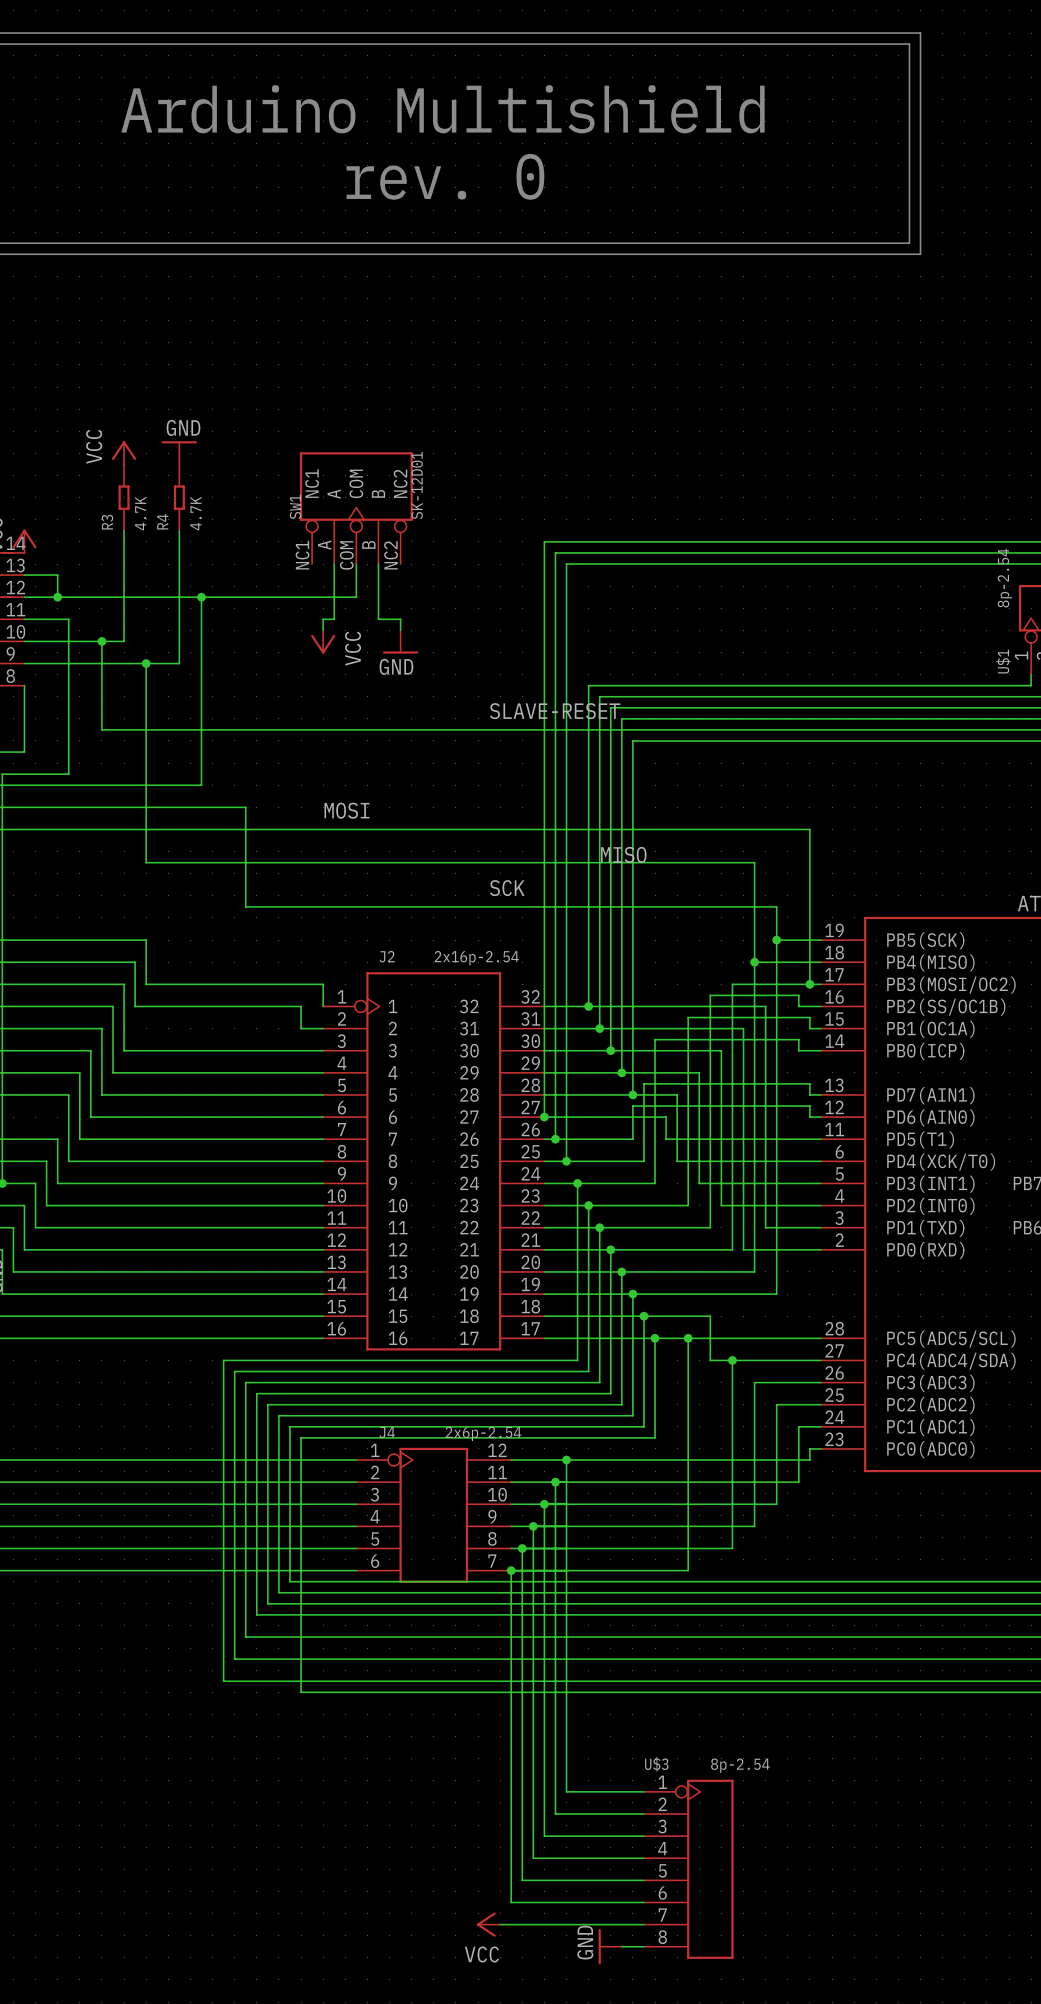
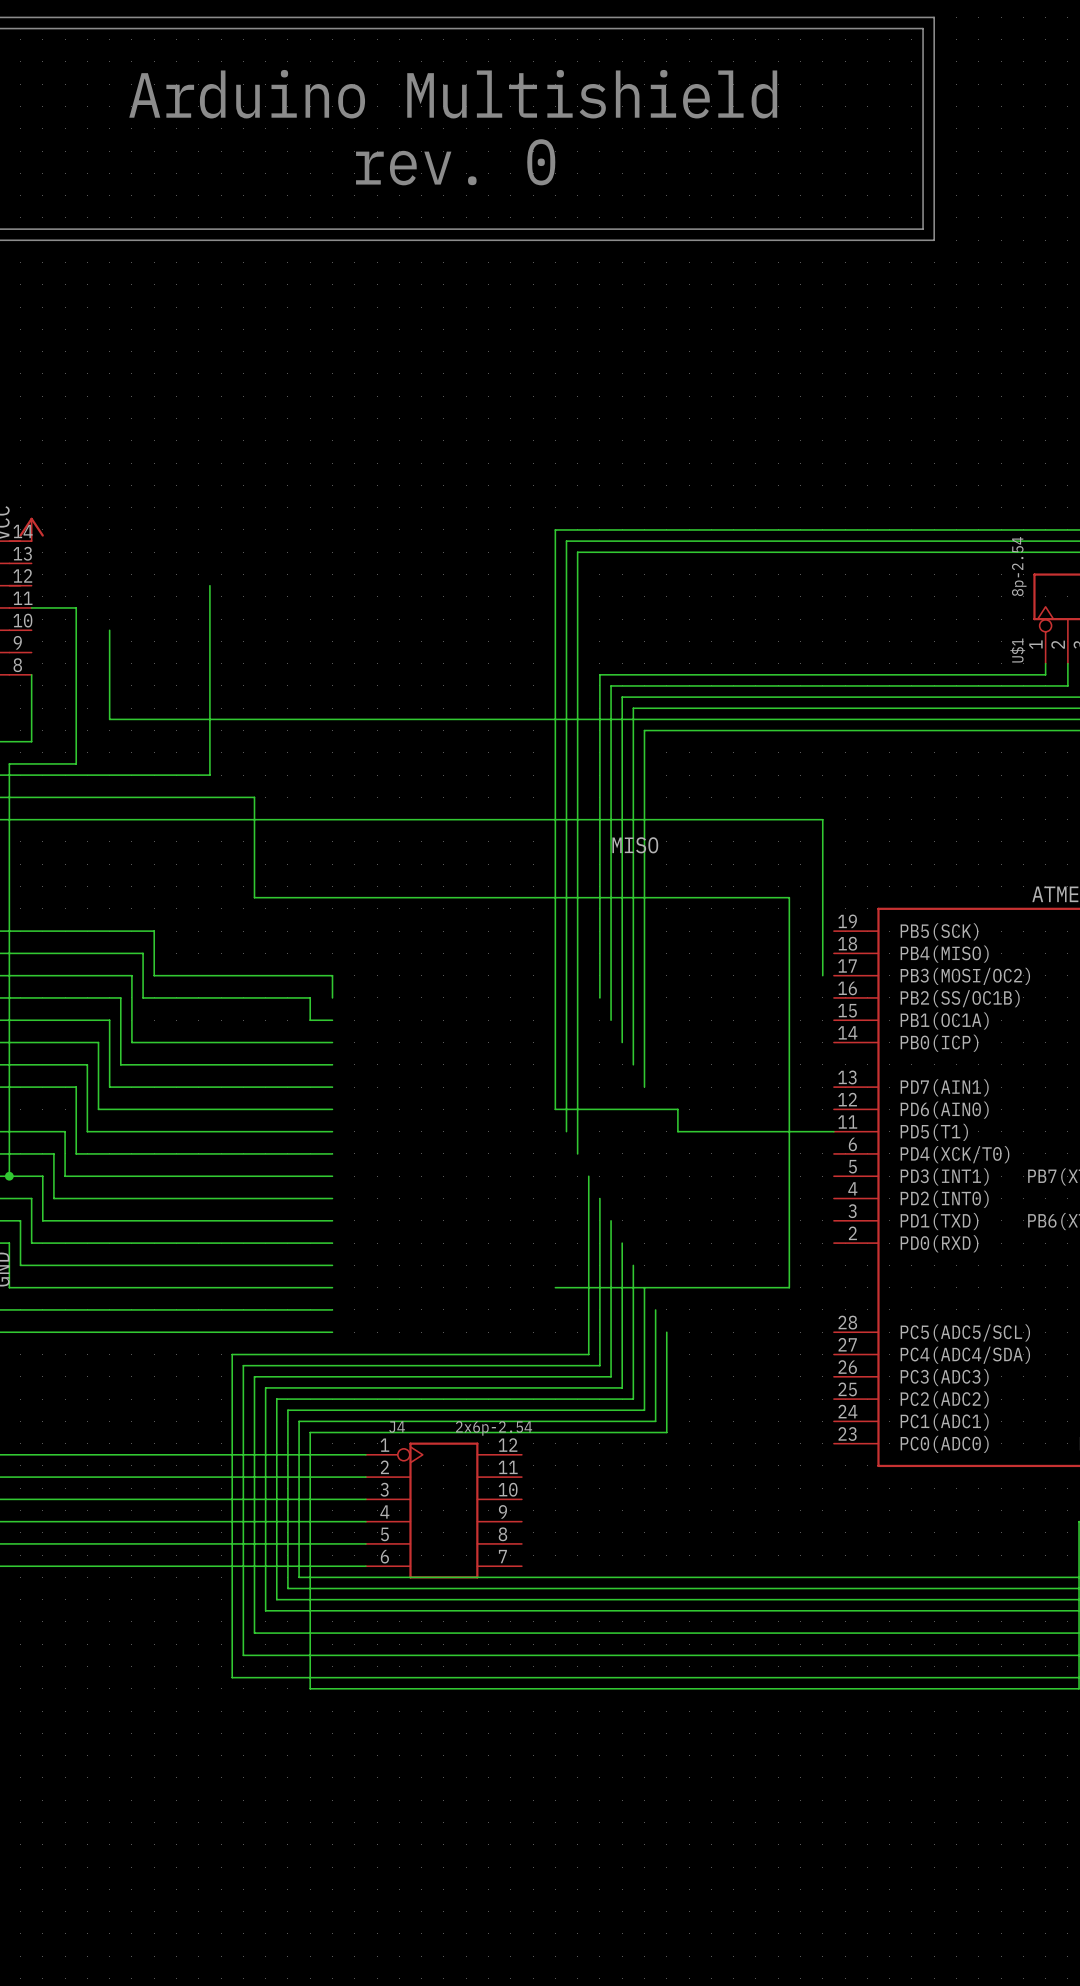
power symbol: VCC (124, 452) -> none
power symbol: GND (179, 452) -> none
R3: 4.7K (124, 497) -> none
R4: 4.7K (179, 497) -> none
SW1: SK-12D01 (356, 508) -> none
wire: (124, 530) (124, 641) (24, 641) -> none
wire: (179, 530) (179, 663) (24, 663) -> none
wire: (334, 564) (334, 619) (323, 619) (323, 630) -> none
wire: (356, 564) (356, 597) (24, 597) -> none
wire: (378, 564) (378, 619) (400, 619) (400, 630) -> none
wire: (24, 575) (57, 575) (57, 597) -> none
junction: (57, 597) -> none
junction: (201, 597) -> none
junction: (101, 641) -> none
power symbol: VCC (323, 641) -> none
power symbol: GND (400, 641) -> none
wire: (146, 663) (146, 862) (754, 862) (754, 1271) (544, 1271) -> none
junction: (146, 663) -> none
label: SLAVE-RESET (555, 711) -> none
label: MOSI (346, 810) -> none
label: SCK (507, 888) -> none
wire: (776, 940) (820, 940) -> none
junction: (776, 940) -> none
wire: (754, 962) (820, 962) -> none
junction: (754, 962) -> none
junction: (809, 984) -> none
wire: (820, 984) (732, 984) (732, 1249) (544, 1249) -> none
wire: (544, 1006) (765, 1006) (765, 1227) (820, 1227) -> none
junction: (588, 1006) -> none
wire: (820, 1006) (798, 1006) (798, 995) (710, 995) (710, 1227) (544, 1227) -> none
wire: (544, 1028) (743, 1028) (743, 1249) (820, 1249) -> none
junction: (599, 1028) -> none
wire: (820, 1028) (809, 1028) (809, 1017) (688, 1017) (688, 1205) (544, 1205) -> none
wire: (544, 1050) (721, 1050) (721, 1205) (820, 1205) -> none
junction: (610, 1050) -> none
wire: (820, 1050) (798, 1050) (798, 1039) (655, 1039) (655, 1183) (544, 1183) -> none
wire: (544, 1072) (699, 1072) (699, 1183) (820, 1183) -> none
junction: (621, 1072) -> none
wire: (544, 1094) (677, 1094) (677, 1161) (820, 1161) -> none
junction: (632, 1094) -> none
wire: (820, 1094) (809, 1094) (809, 1083) (643, 1083) (643, 1161) (544, 1161) -> none
junction: (544, 1117) -> none
wire: (820, 1117) (809, 1117) (809, 1106) (632, 1106) (632, 1139) (544, 1139) -> none
junction: (555, 1139) -> none
J2: 2x16p-2.54 (433, 1161) -> none
junction: (566, 1161) -> none
junction: (577, 1183) -> none
junction: (588, 1205) -> none
junction: (599, 1227) -> none
junction: (610, 1249) -> none
junction: (621, 1271) -> none
junction: (632, 1294) -> none
wire: (544, 1316) (710, 1316) (710, 1360) (820, 1360) -> none
junction: (643, 1316) -> none
wire: (544, 1338) (820, 1338) -> none
junction: (655, 1338) -> none
wire: (688, 1338) (688, 1570) (511, 1570) (511, 1902) (643, 1902) -> none
junction: (688, 1338) -> none
wire: (732, 1360) (732, 1548) (511, 1548) -> none
junction: (732, 1360) -> none
wire: (820, 1382) (754, 1382) (754, 1526) (511, 1526) -> none
wire: (820, 1404) (776, 1404) (776, 1504) (511, 1504) -> none
wire: (820, 1426) (798, 1426) (798, 1482) (511, 1482) -> none
wire: (820, 1448) (809, 1448) (809, 1460) (511, 1460) -> none
wire: (566, 1460) (566, 1791) (643, 1791) -> none
junction: (566, 1460) -> none
wire: (555, 1482) (555, 1813) (643, 1813) -> none
junction: (555, 1482) -> none
wire: (544, 1504) (544, 1836) (643, 1836) -> none
junction: (544, 1504) -> none
wire: (533, 1526) (533, 1858) (643, 1858) -> none
junction: (533, 1526) -> none
wire: (522, 1548) (522, 1880) (643, 1880) -> none
junction: (522, 1548) -> none
junction: (511, 1570) -> none
U$3: 8p-2.54 (688, 1869) -> none
power symbol: VCC (488, 1924) -> none
wire: (500, 1924) (643, 1924) -> none
power symbol: GND (610, 1946) -> none
wire: (621, 1946) (643, 1946) -> none

